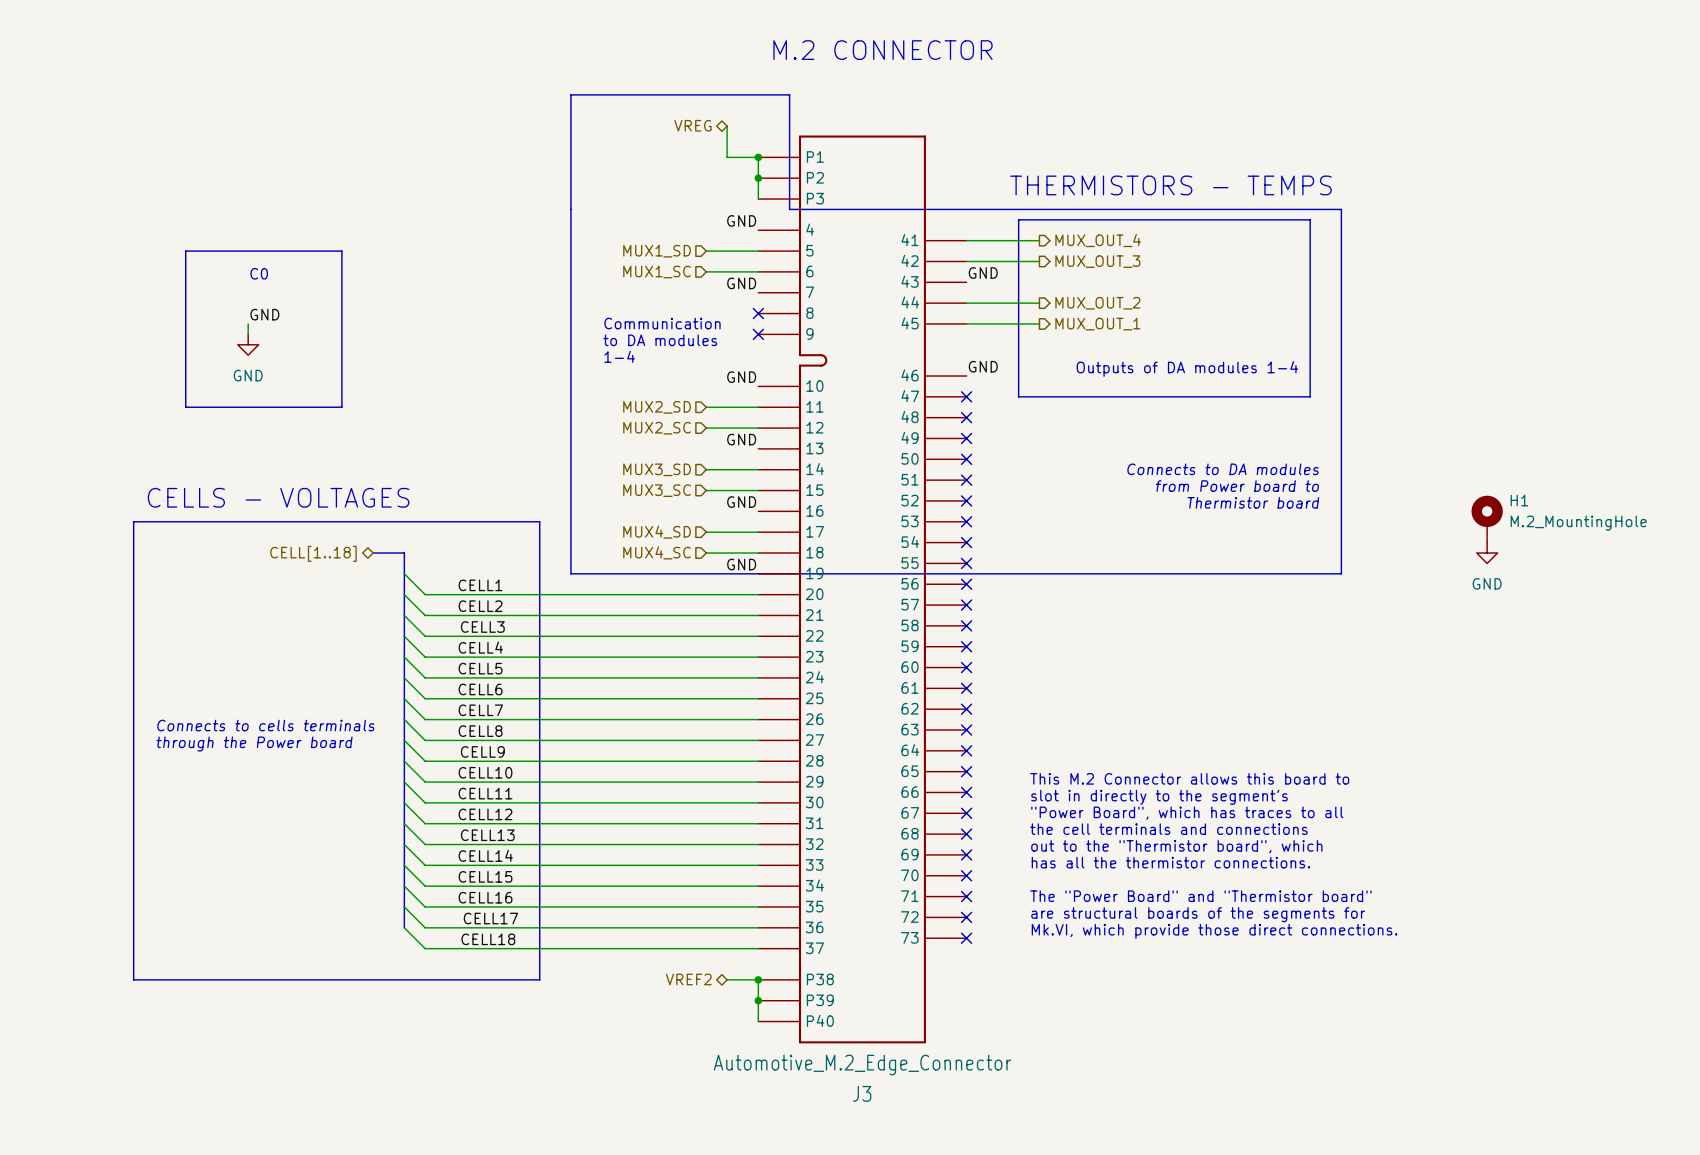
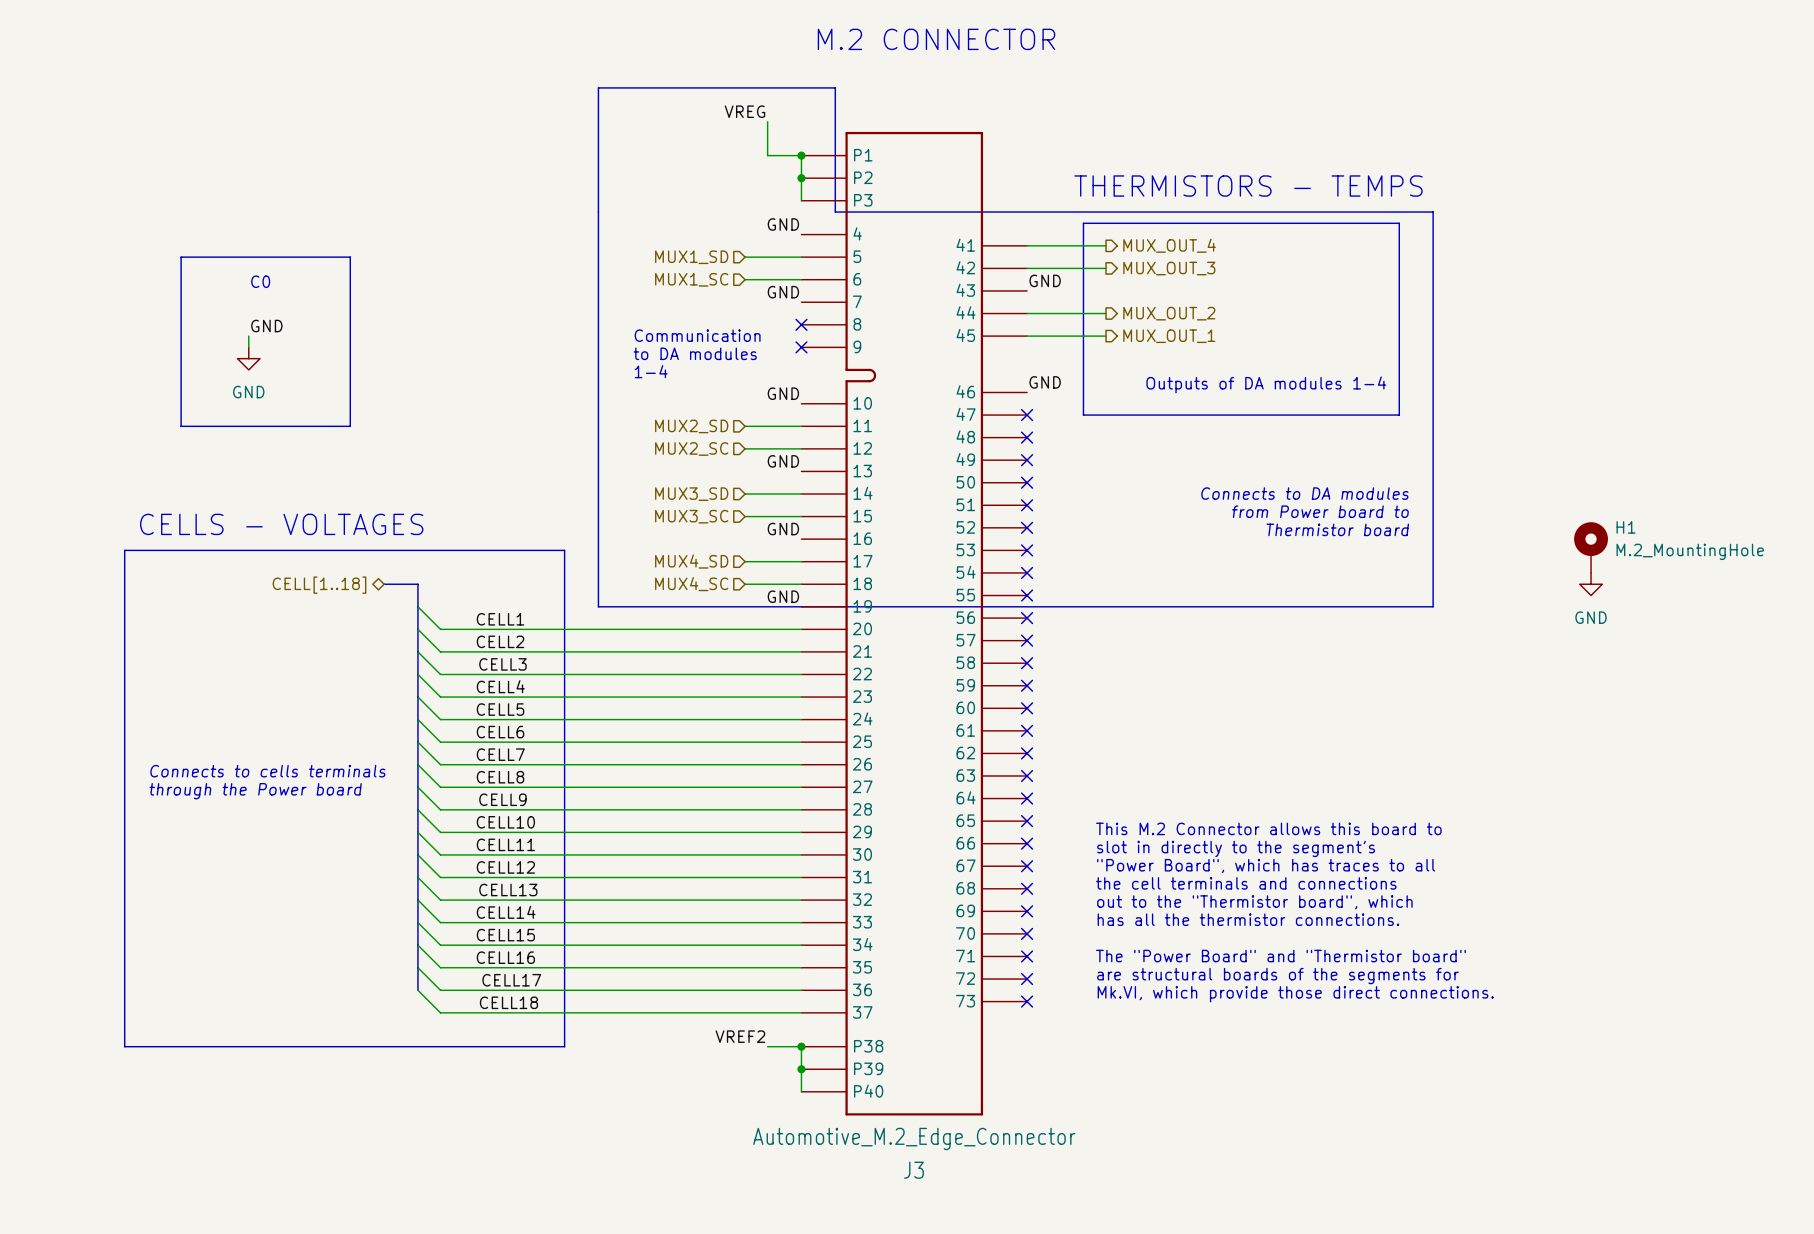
label: none -> VREG (744, 111)
hierarchical label: VREG (692, 125) -> none
label: none -> VREF2 (740, 1036)
hierarchical label: VREF2 (688, 979) -> none

